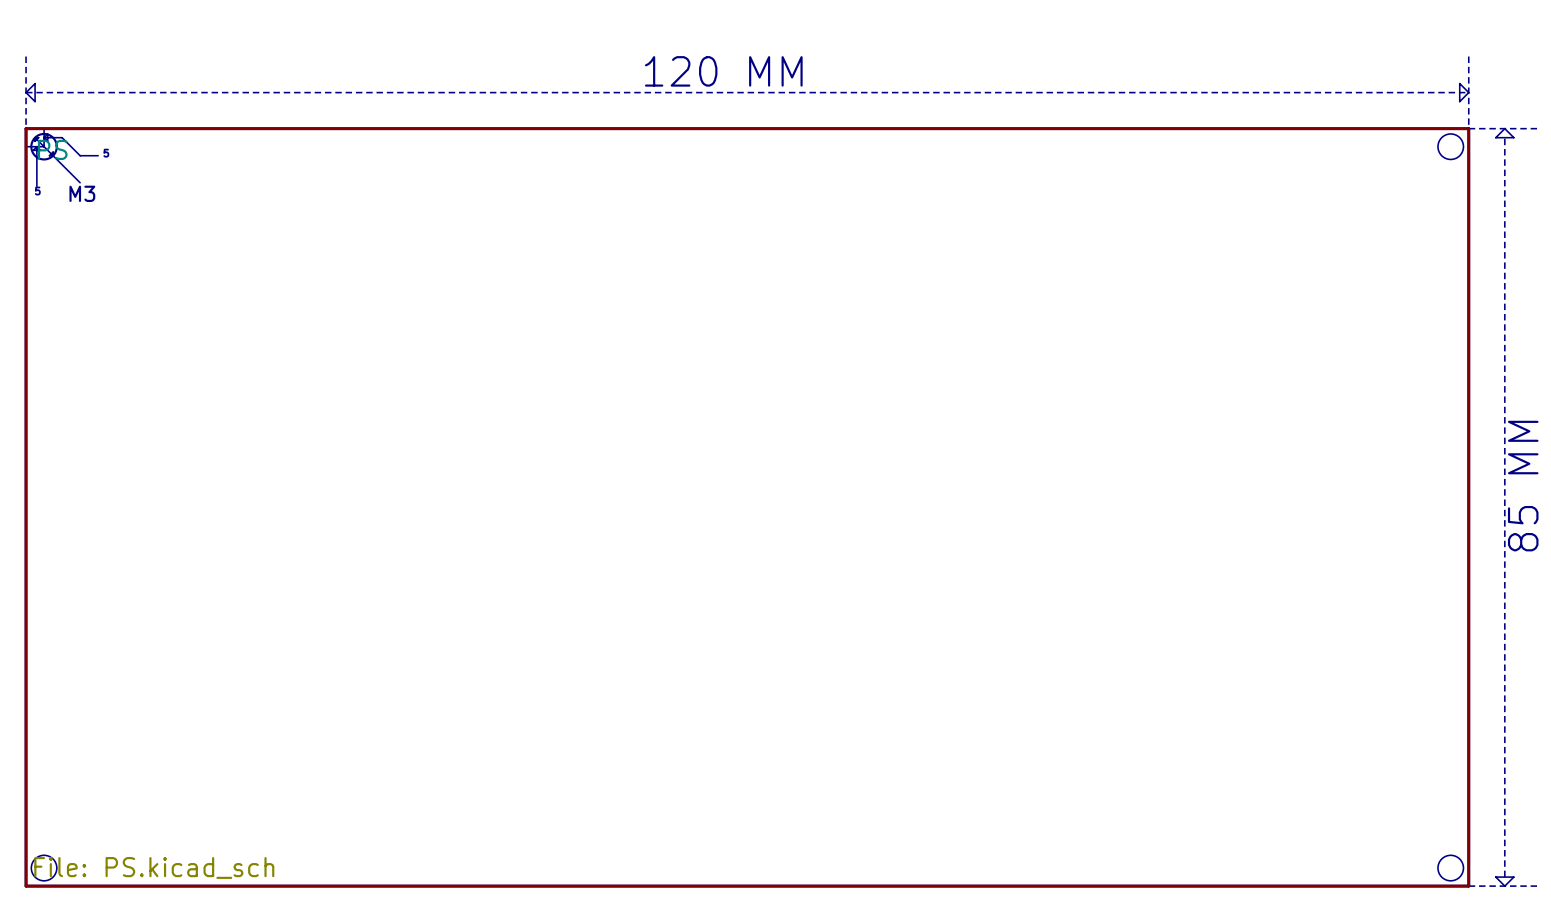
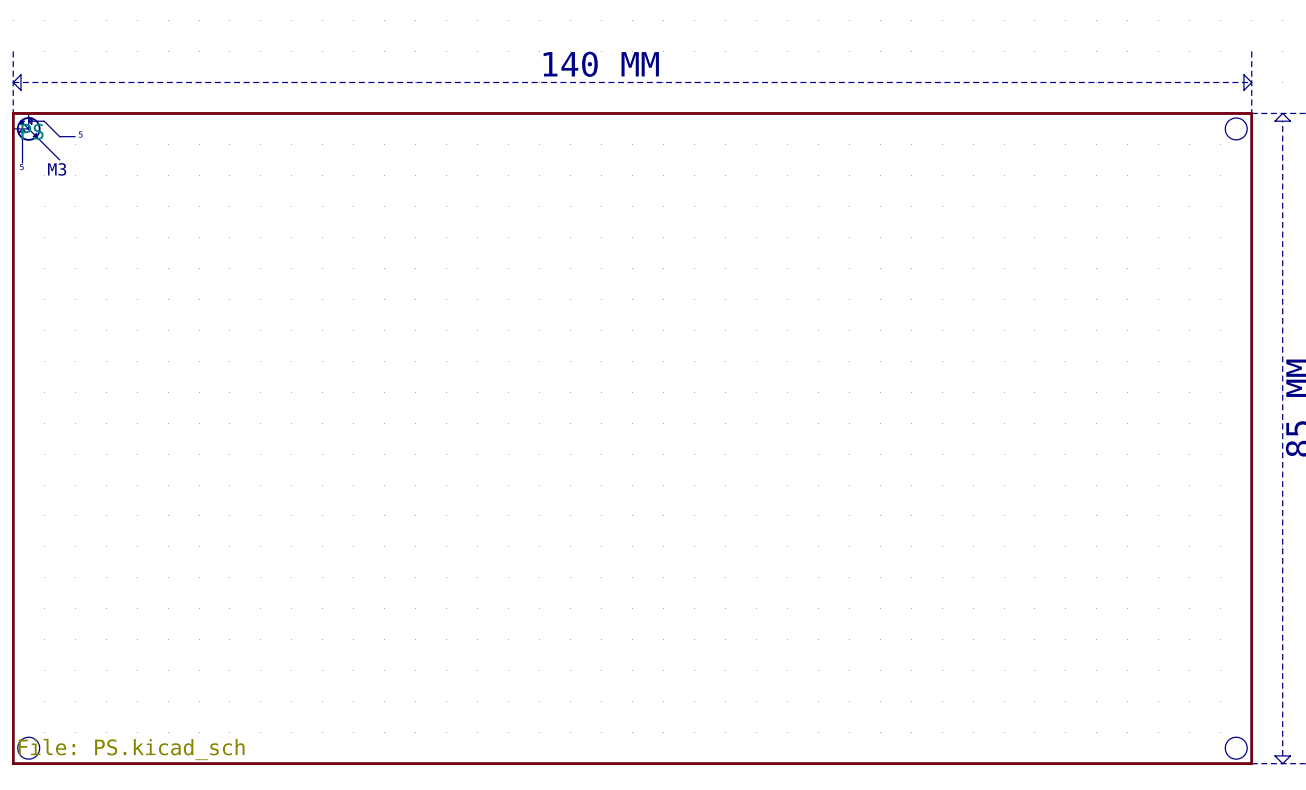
text: 120 MM (723, 71) -> 140 MM (601, 64)

